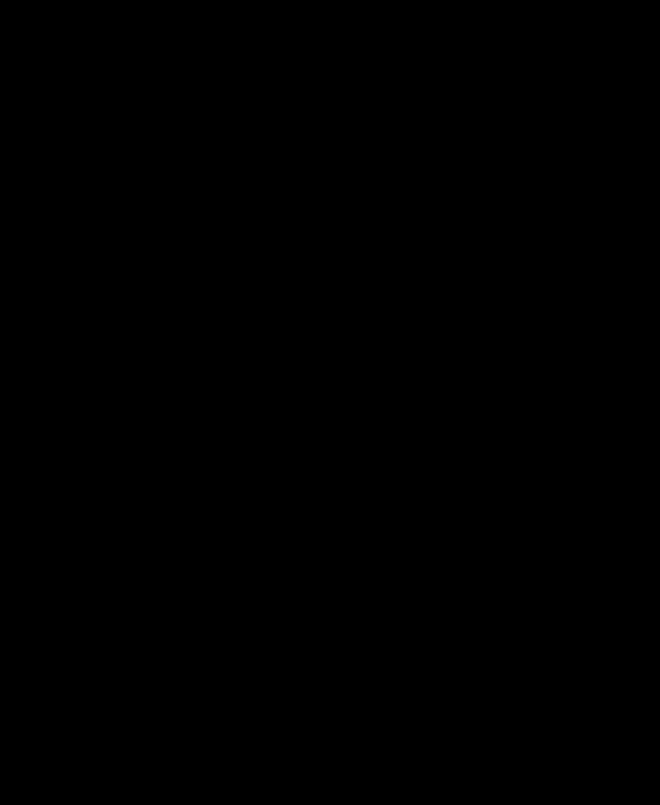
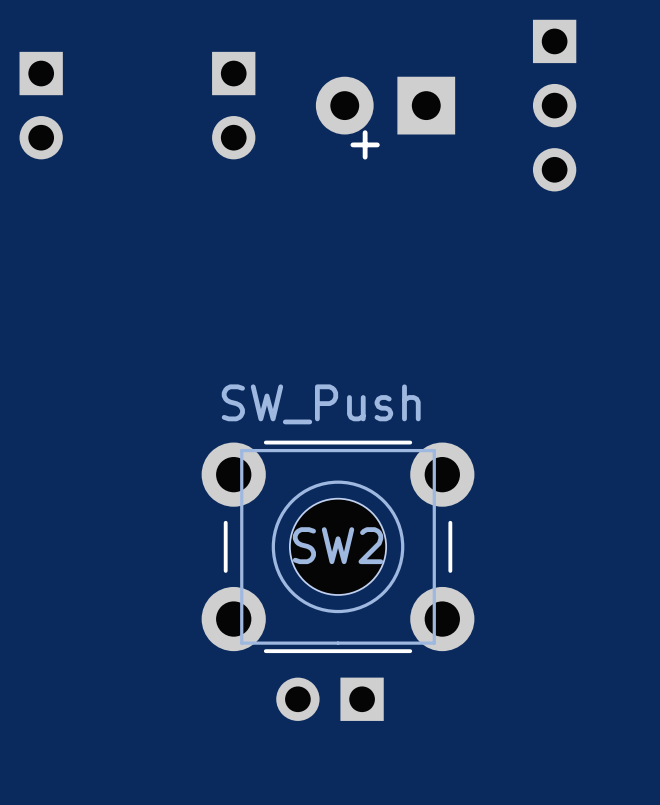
part: none -> (41, 105)
part: none -> (233, 105)
part: none -> (385, 105)
part: none -> (554, 105)
SW2: none -> SW_Push (338, 546)
part: none -> (338, 546)
part: none -> (329, 699)

